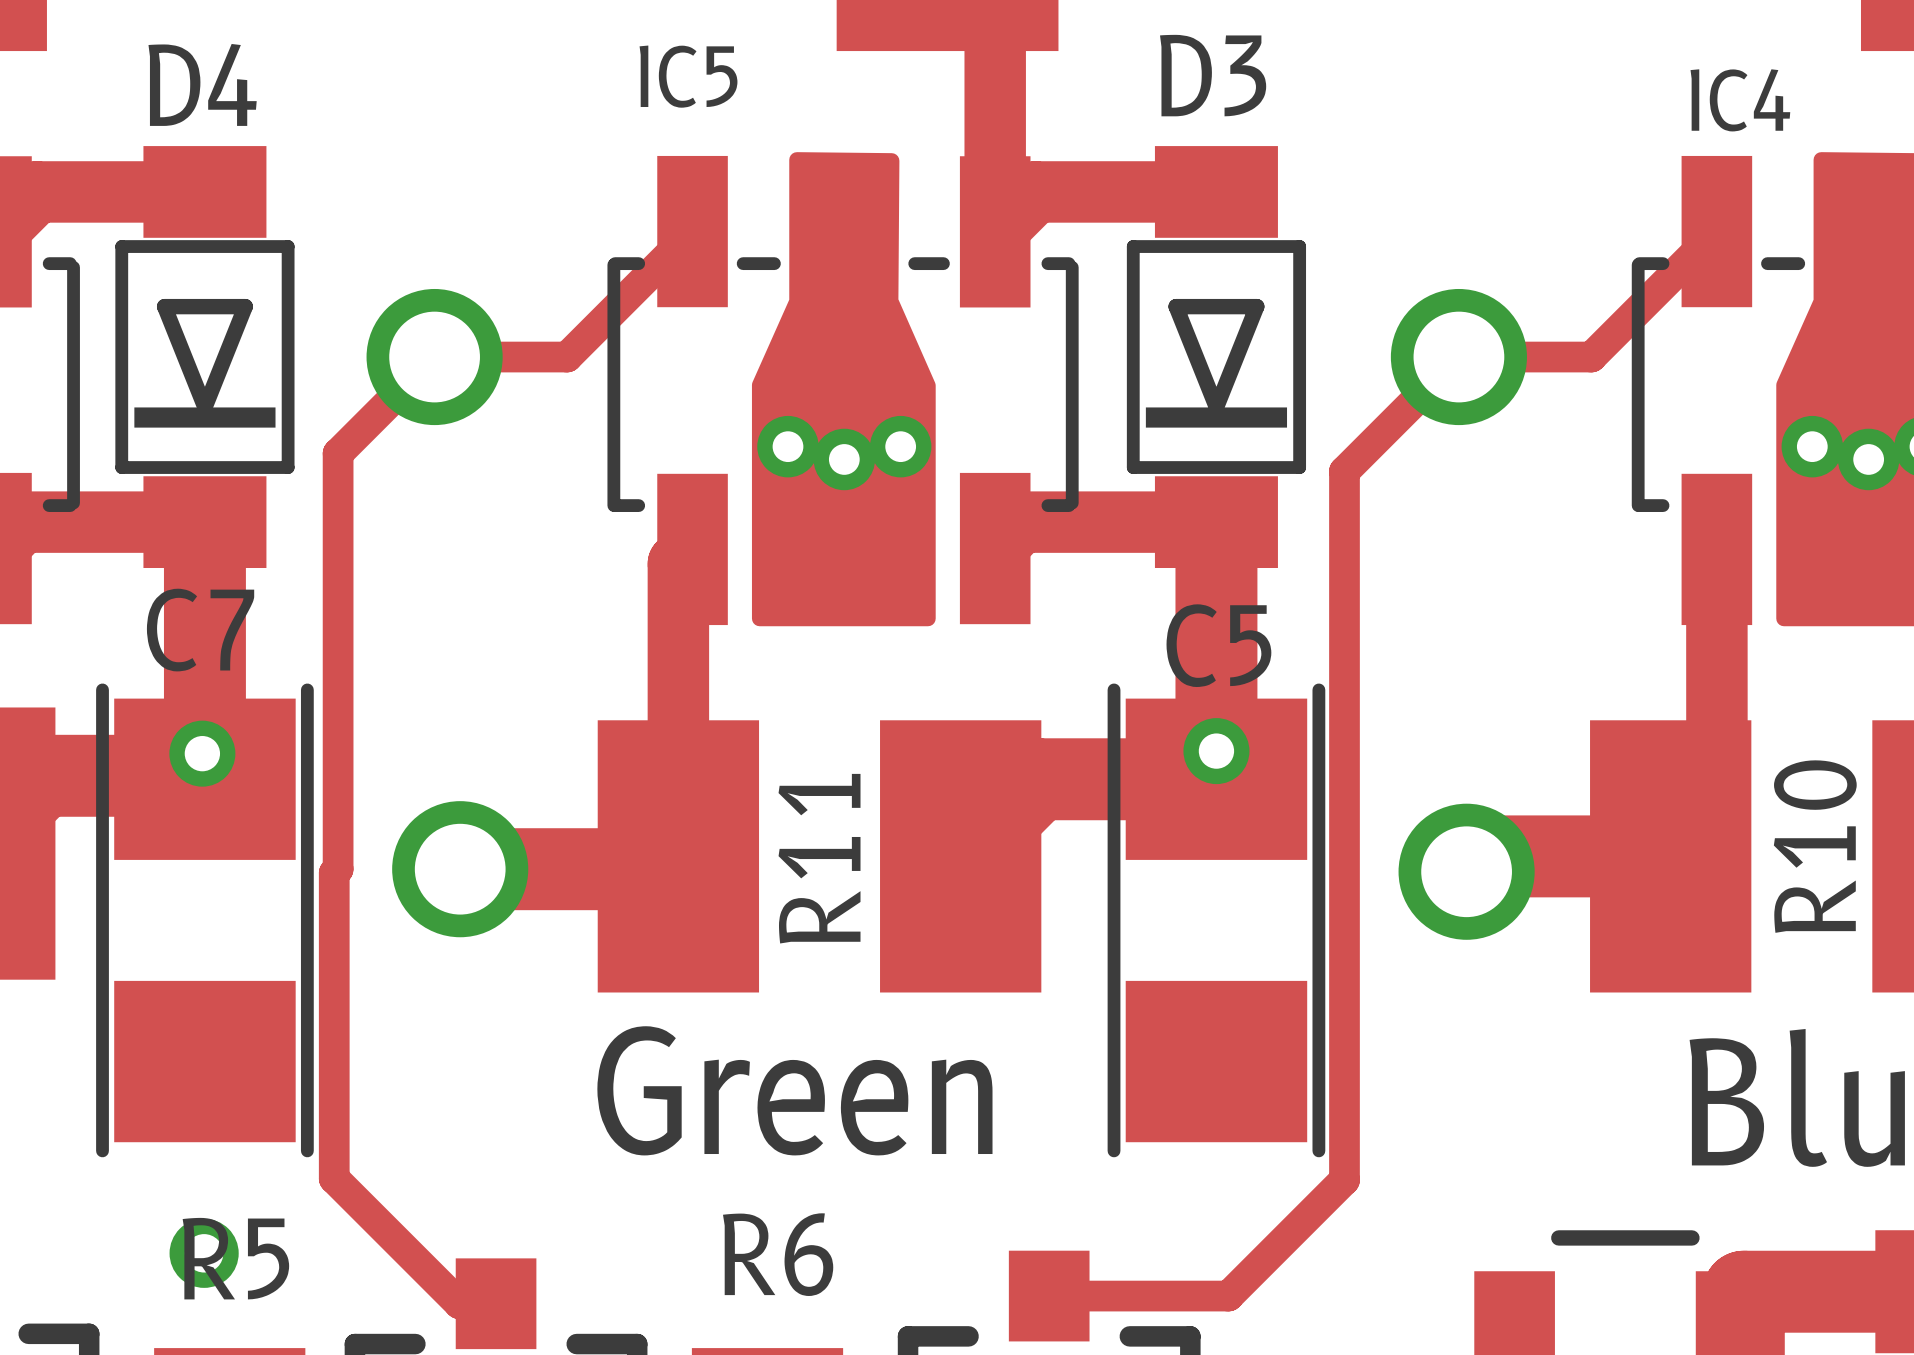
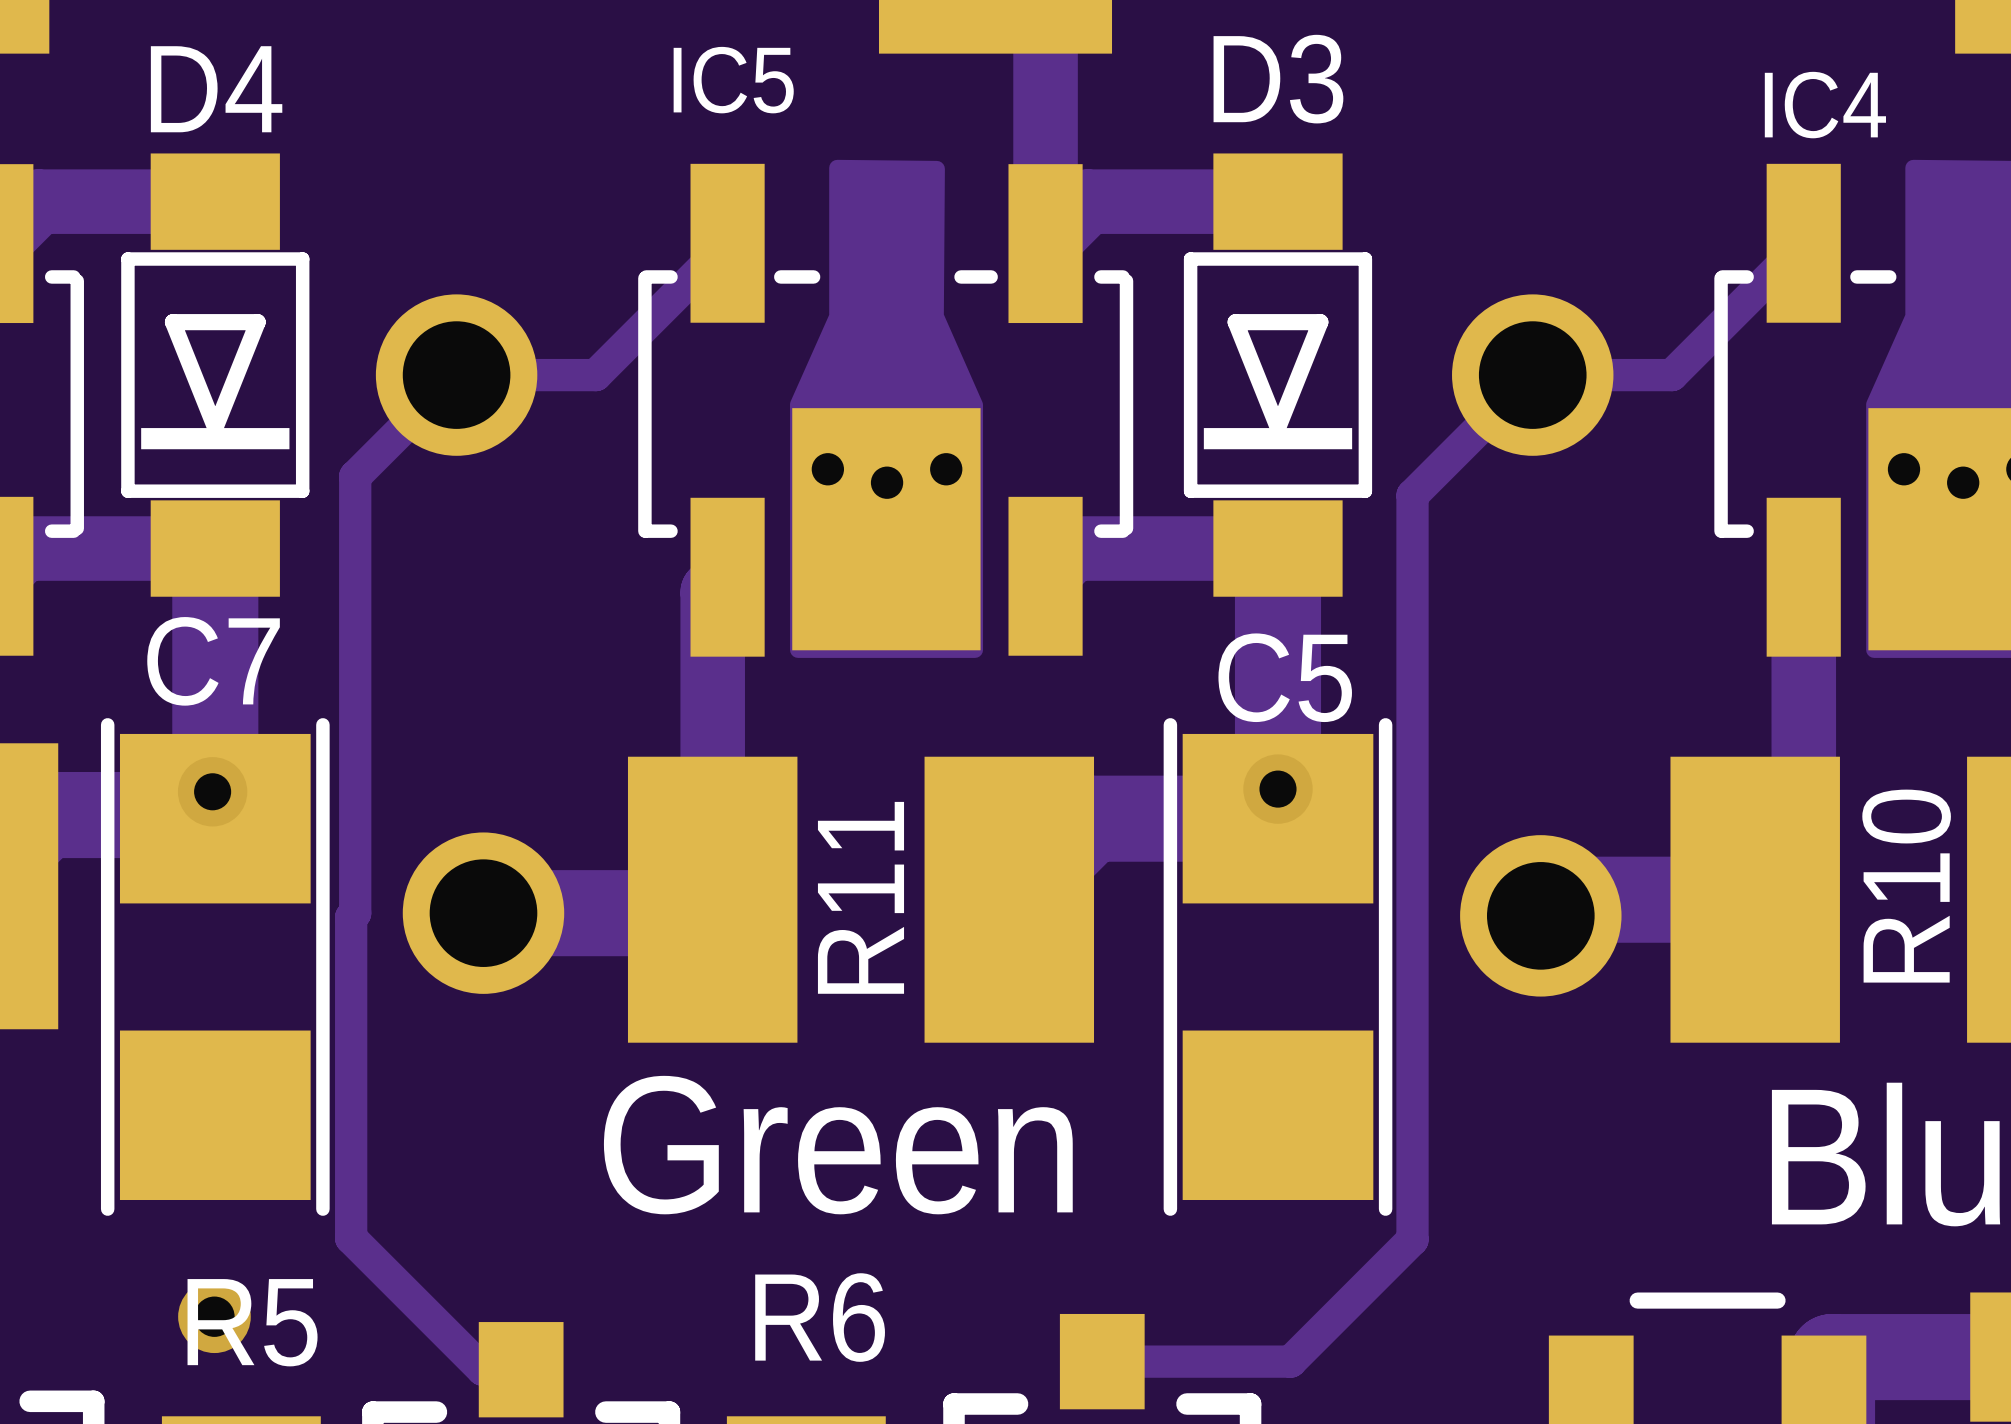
part footprint: [366, 288, 503, 426] -> [375, 294, 538, 456]
part footprint: [1390, 288, 1527, 426] -> [1452, 294, 1614, 456]
part footprint: [392, 801, 529, 938] -> [402, 832, 565, 994]
part footprint: [1398, 803, 1535, 940] -> [1460, 835, 1622, 997]

